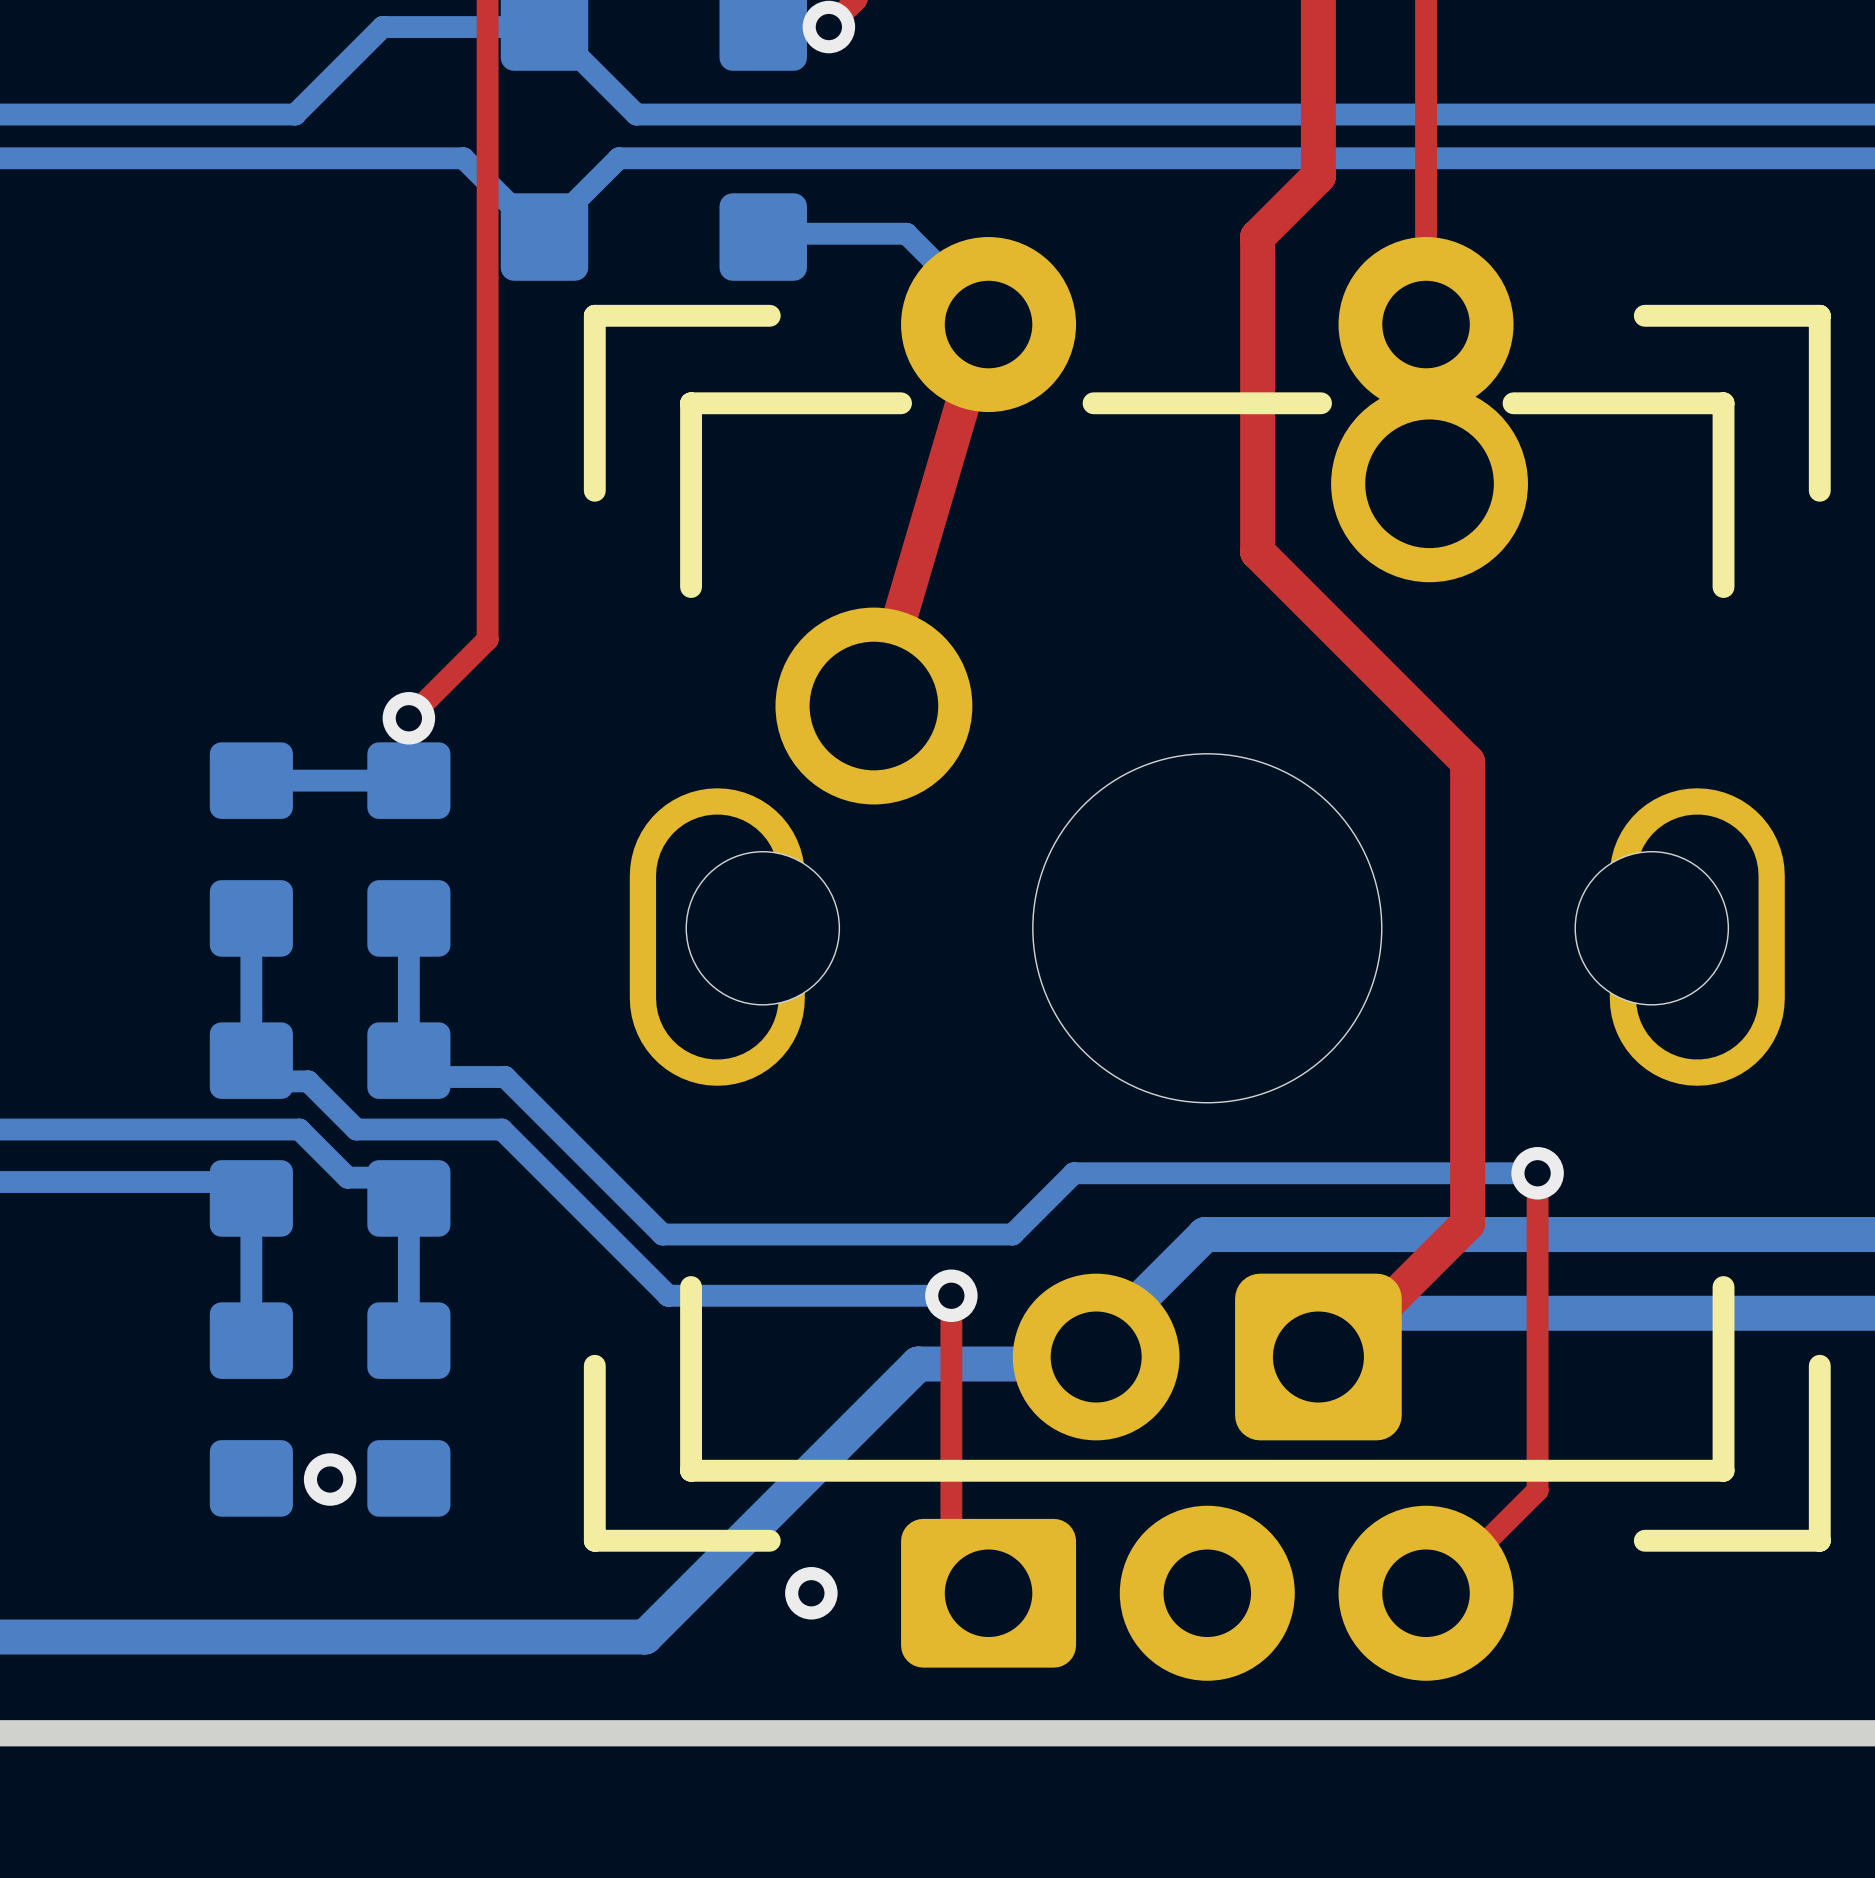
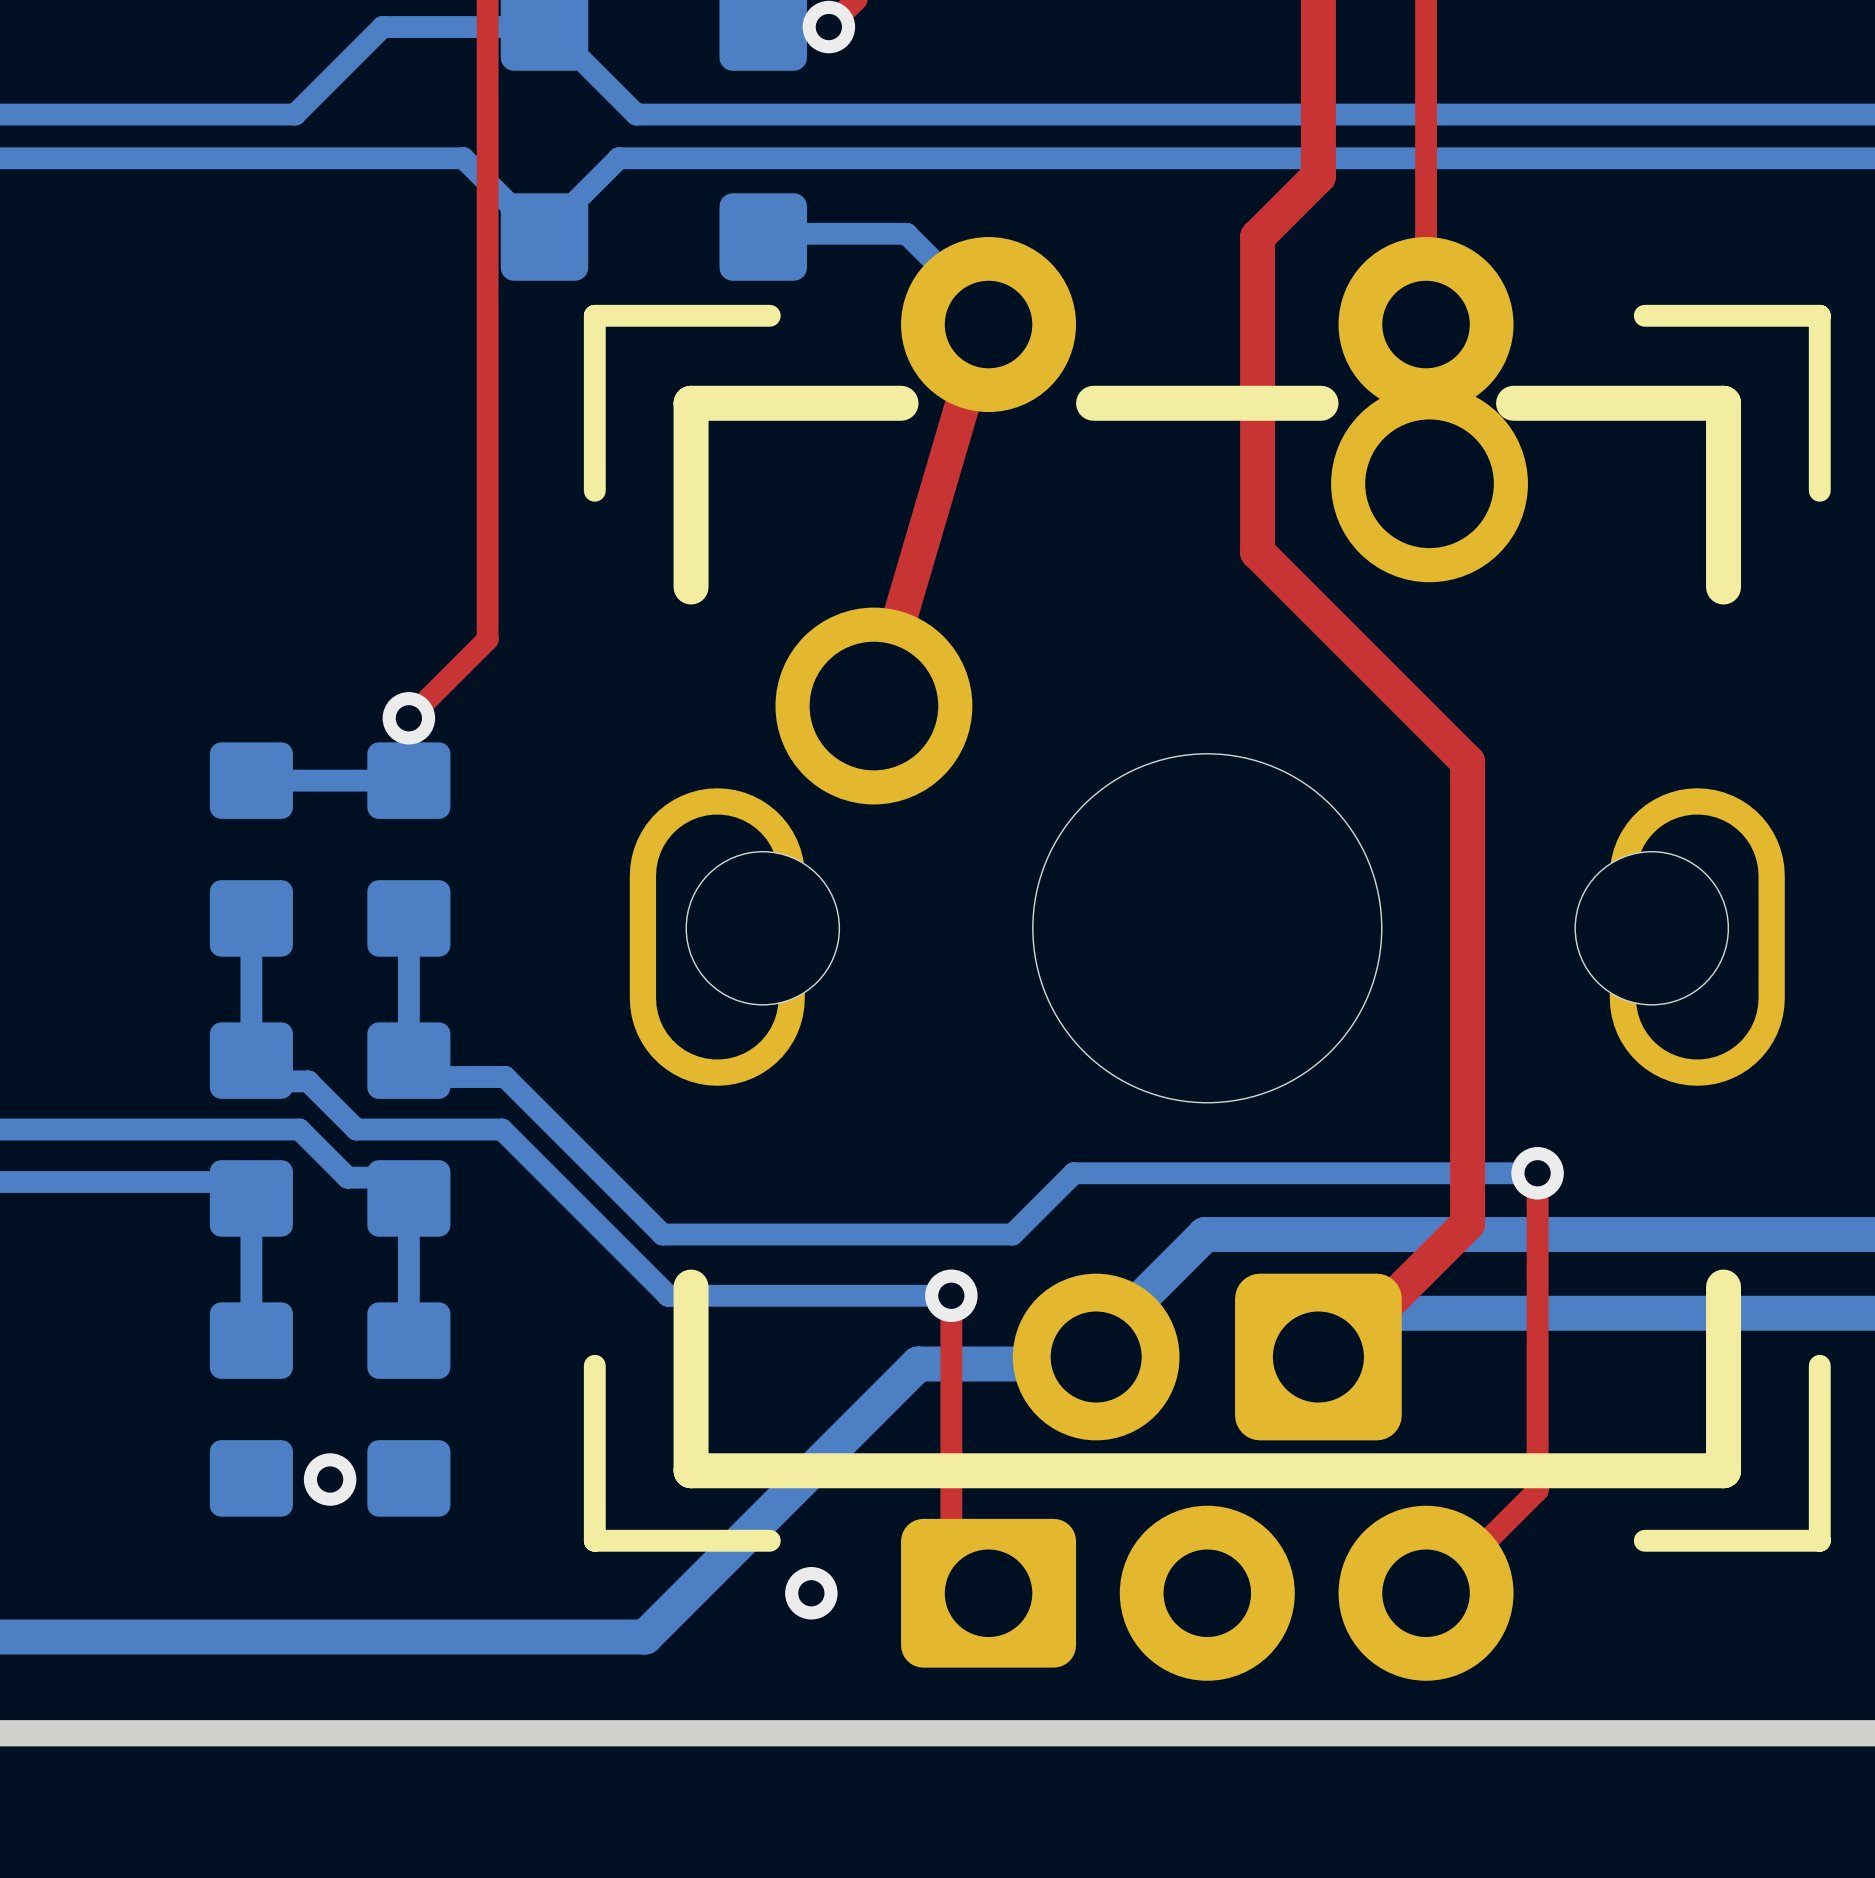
part footprint: [629, 237, 1785, 1681] -> [629, 237, 1785, 1681]

